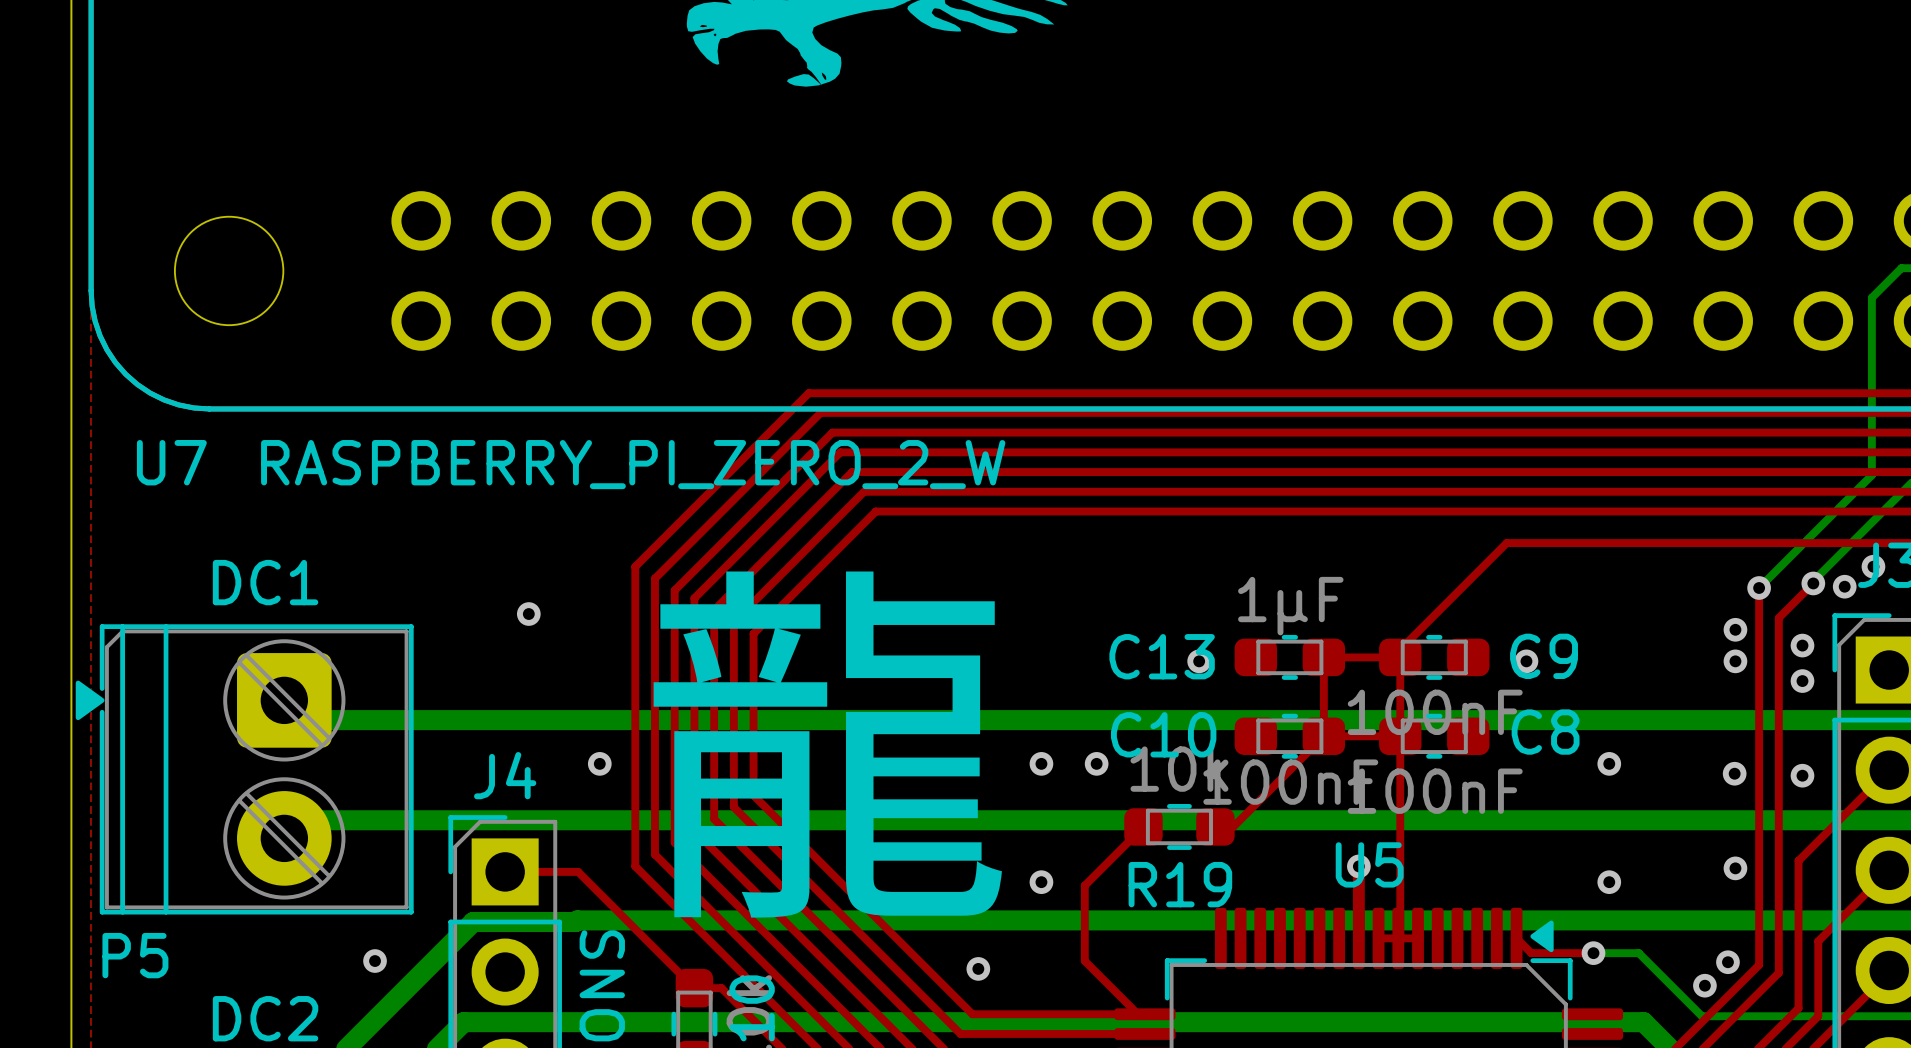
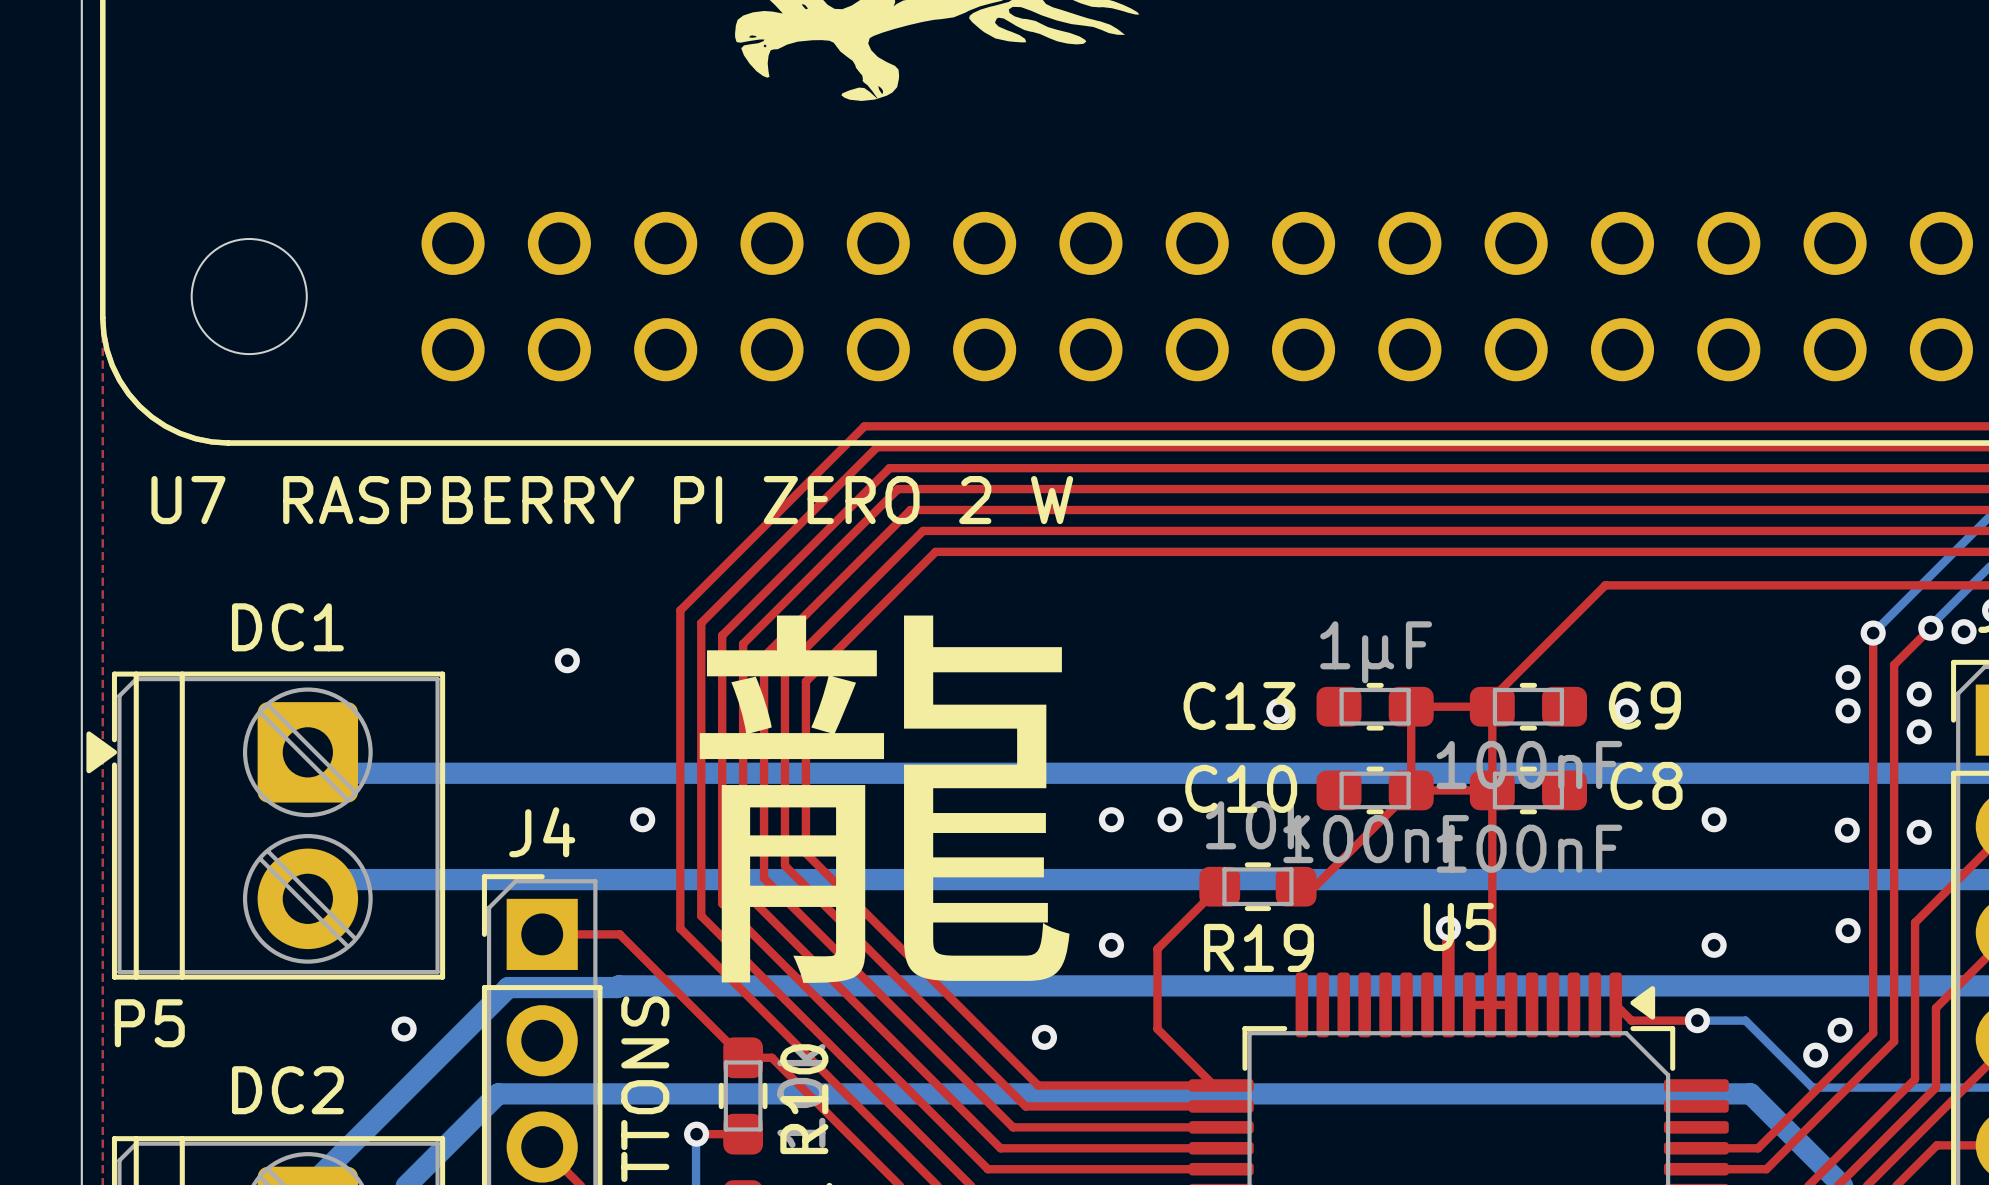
U7 value: RASPBERRY_PI_ZERO_2_W (633, 464) -> RASPBERRY PI ZERO 2 W (678, 500)

